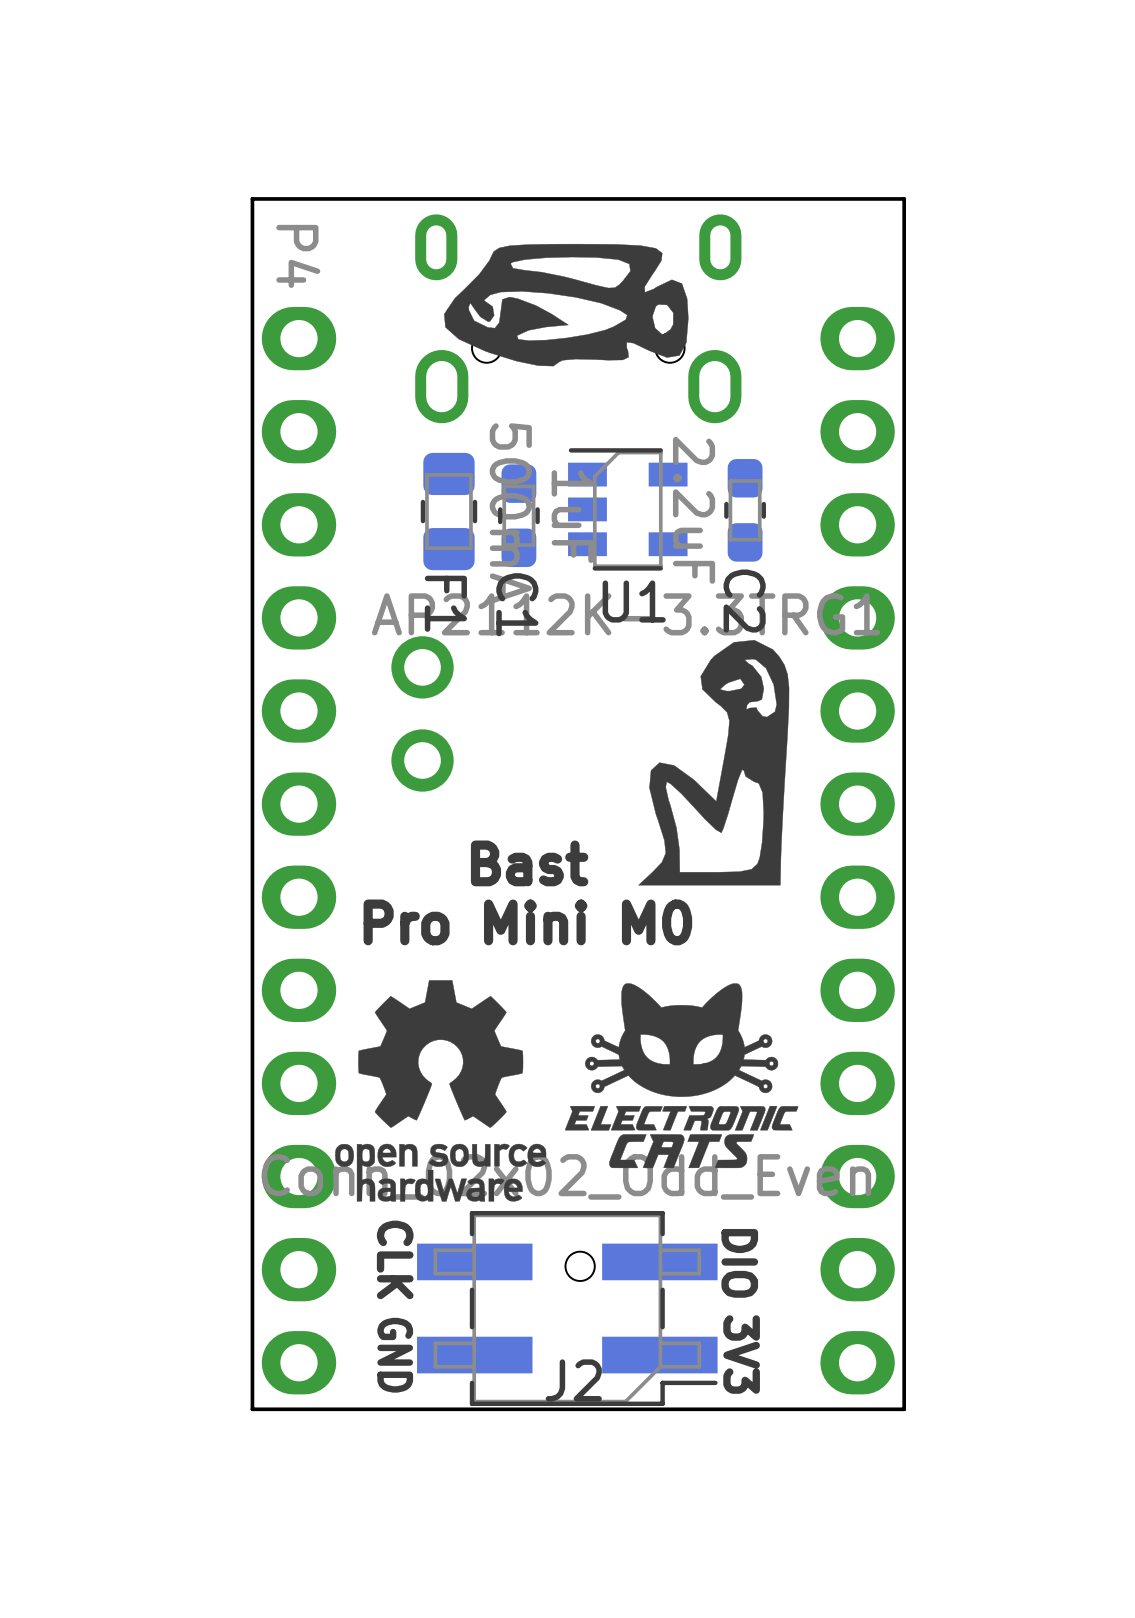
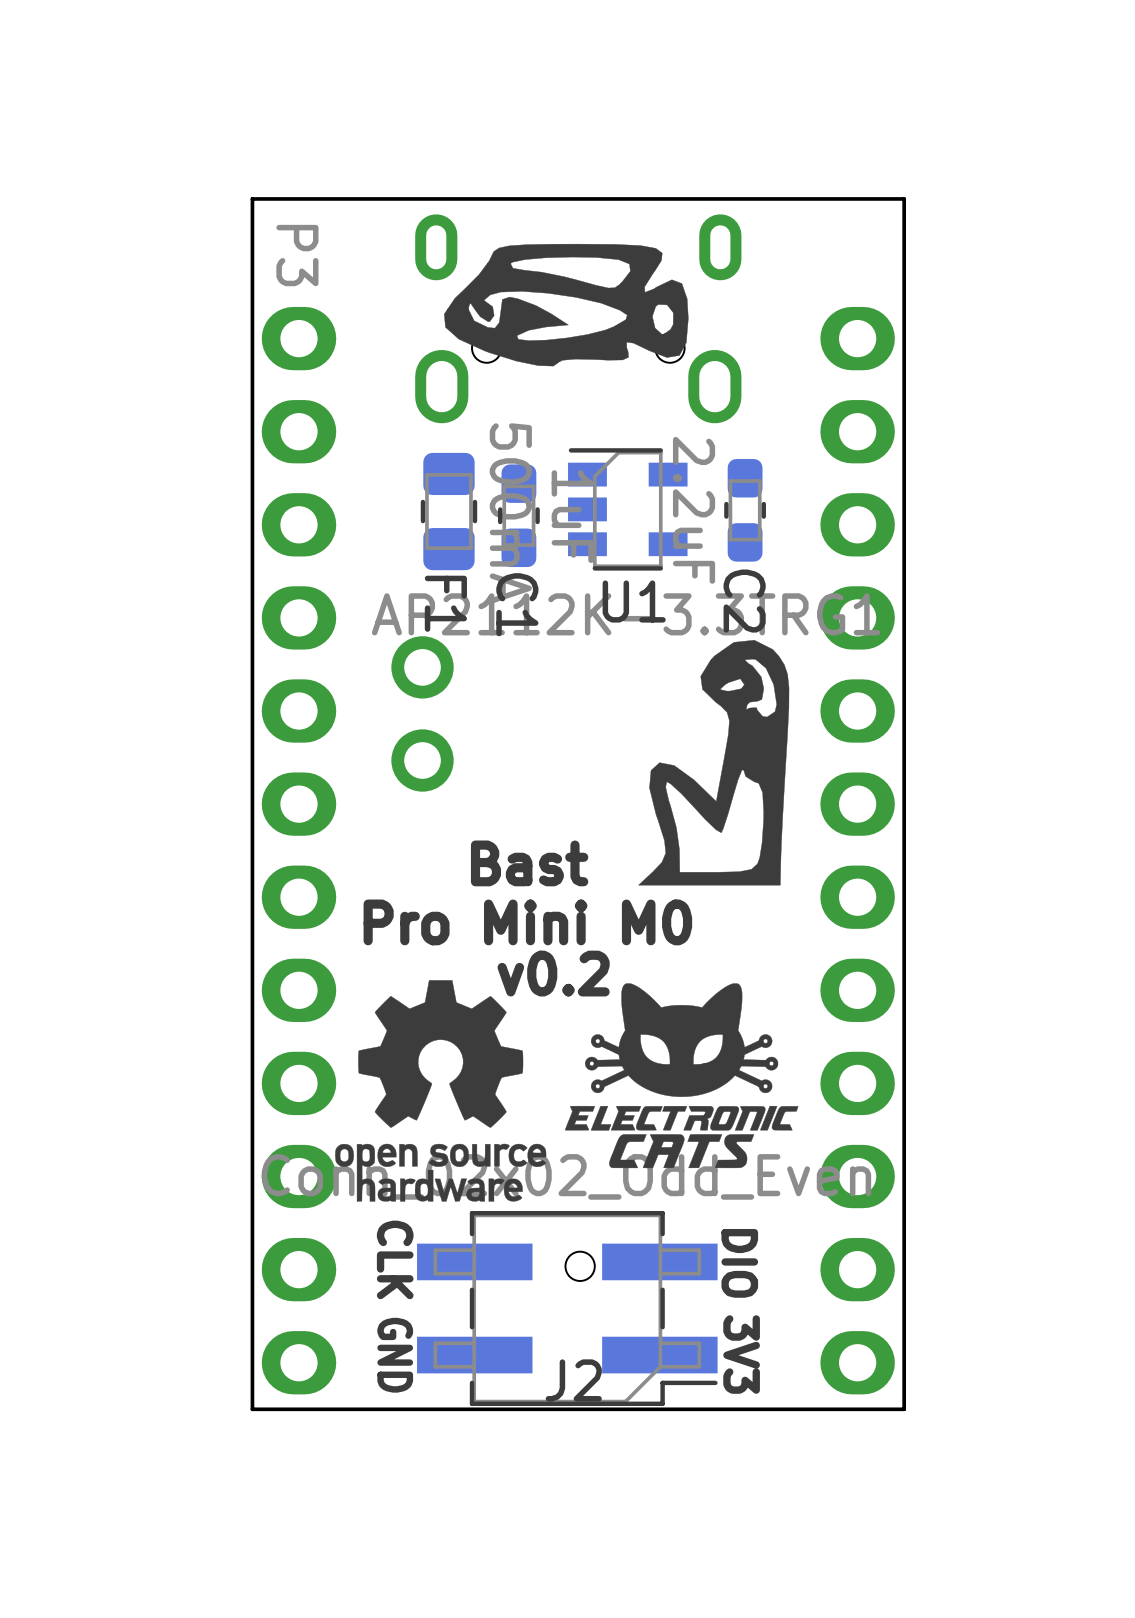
P4 name: P4 (298, 256) -> P3 (297, 255)
text: none -> v0.2 (553, 973)

